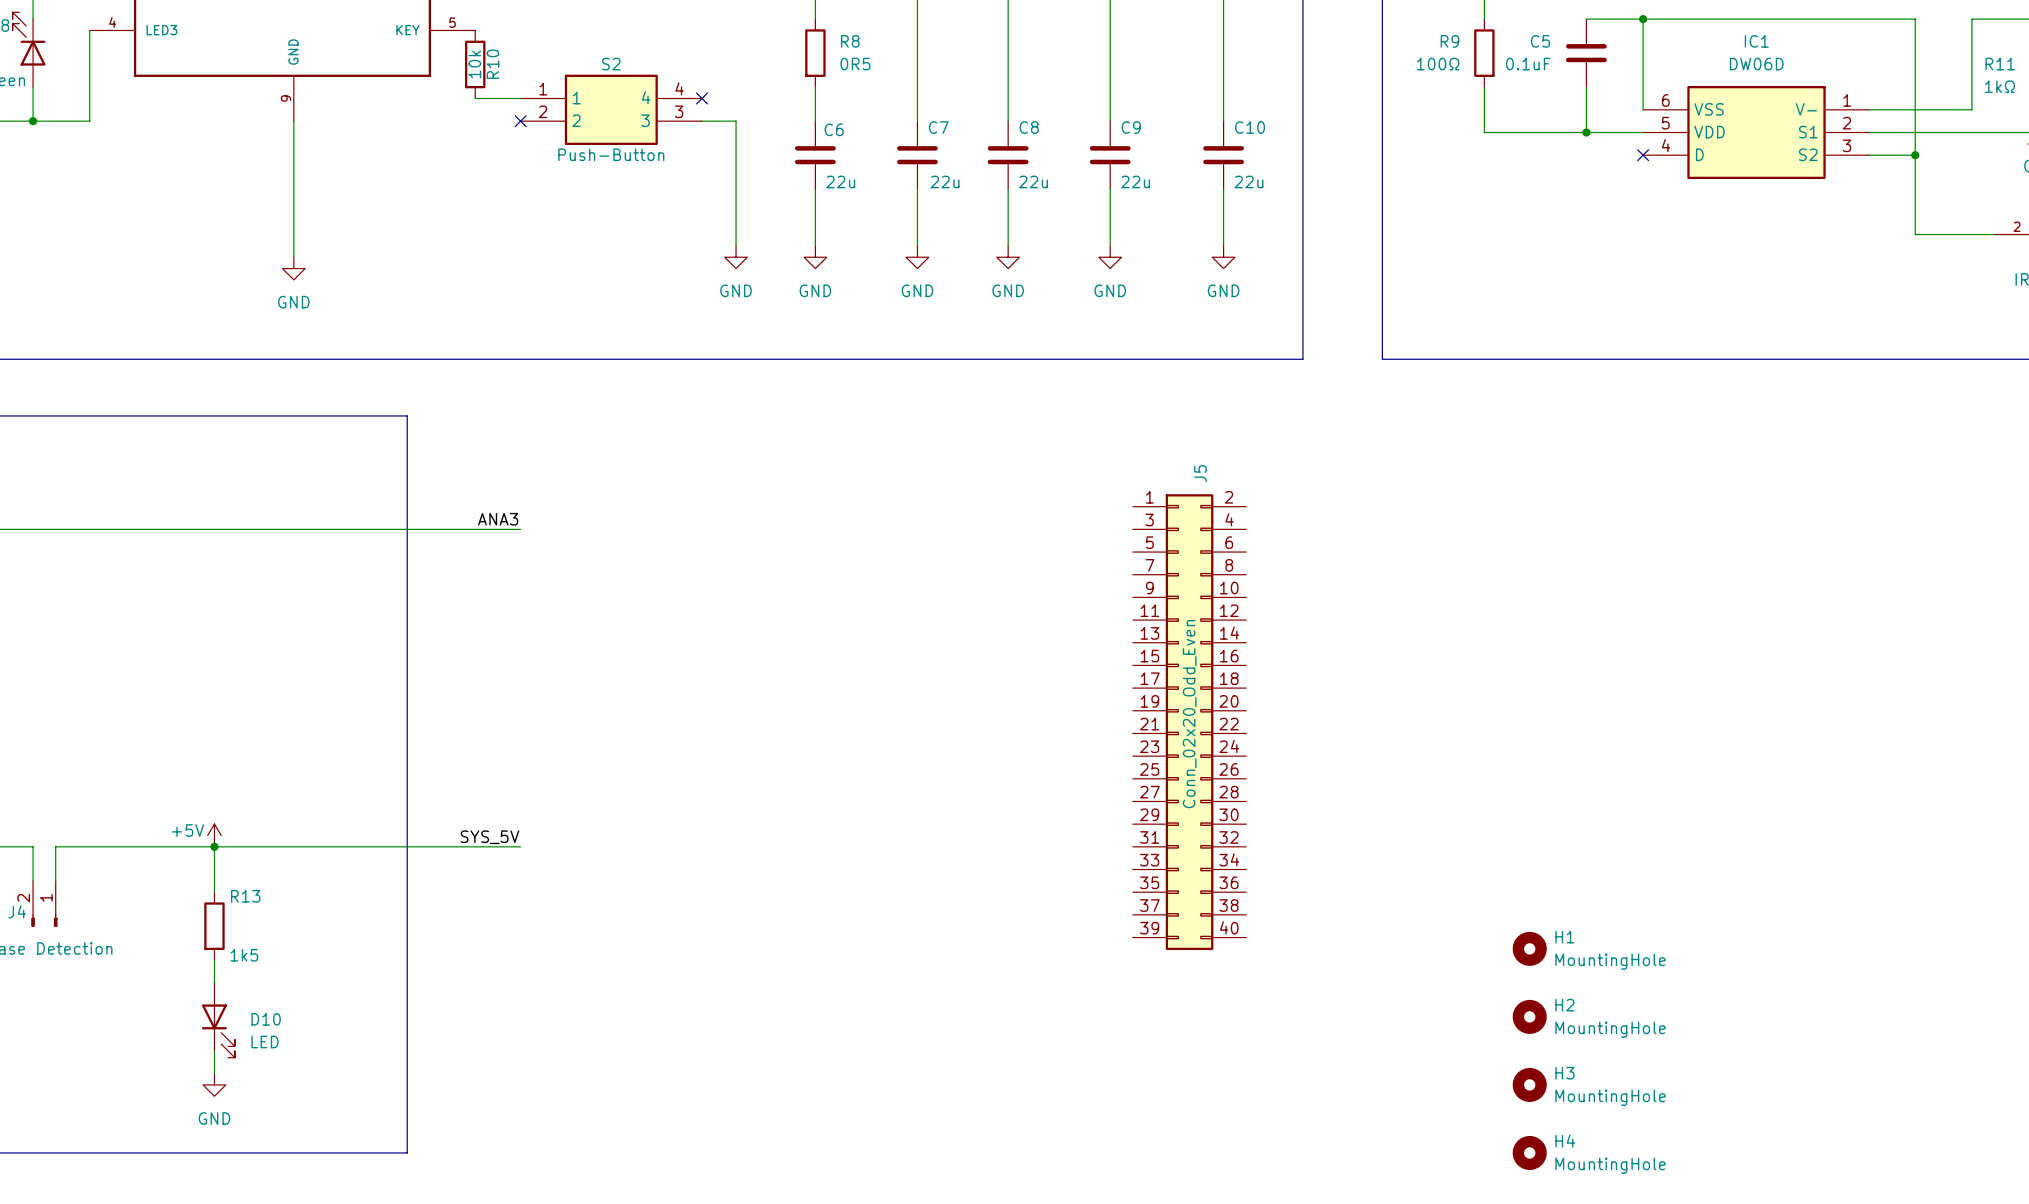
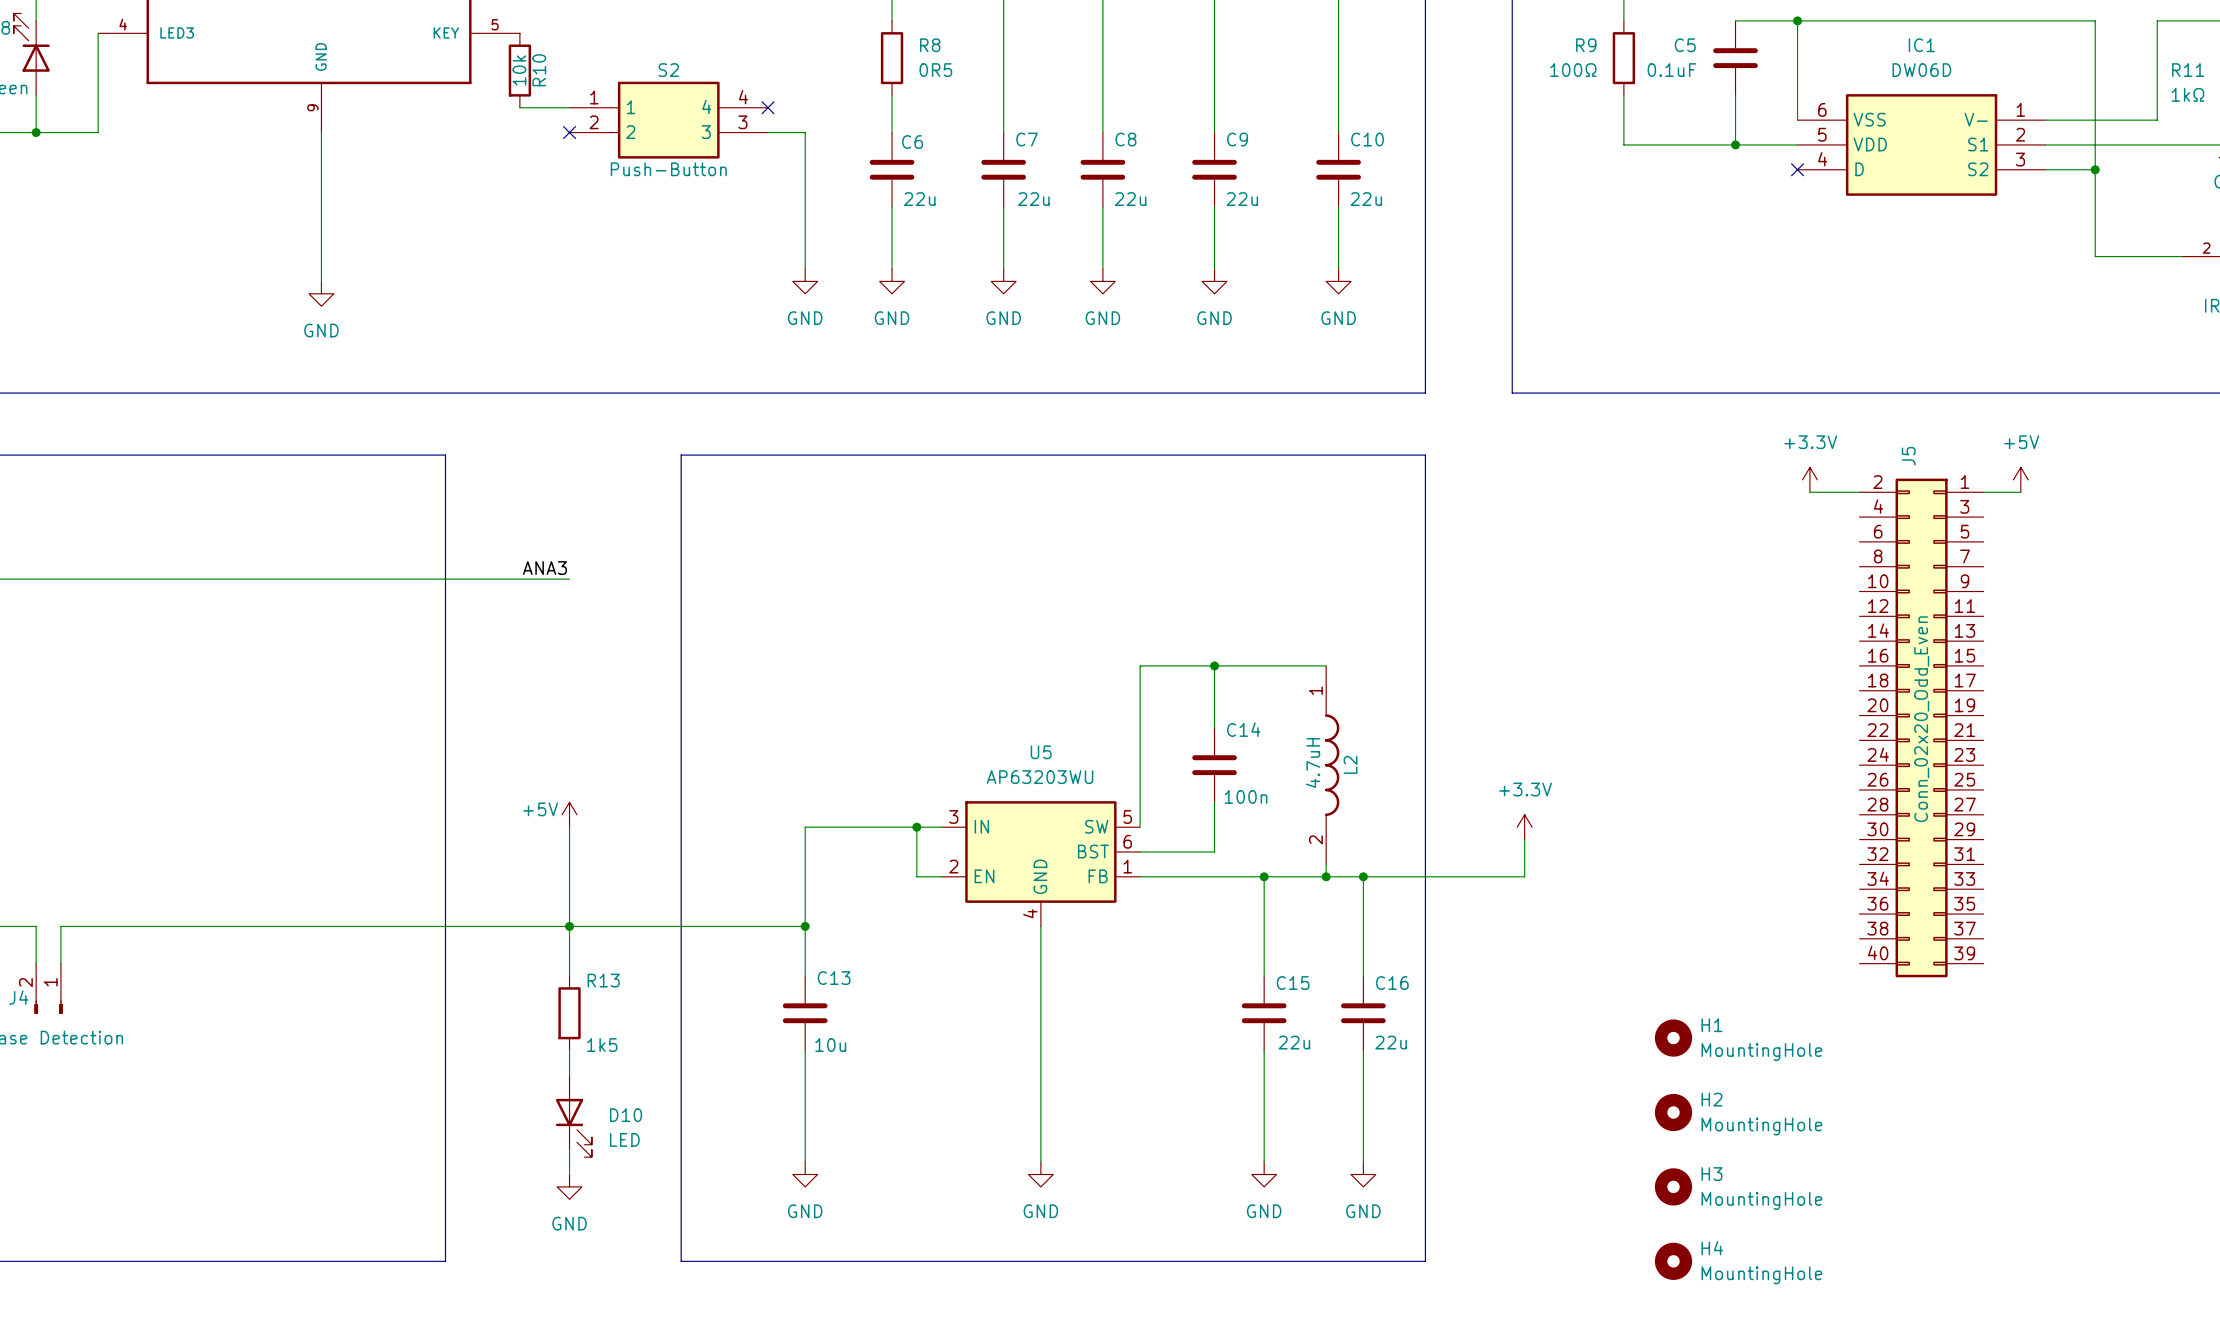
line: none -> (681, 455) (1425, 455) (1425, 1261) (681, 1261) (681, 455)
power symbol: none -> +3.3V (1809, 479)
power symbol: none -> +5V (2020, 479)
wire: none -> (1809, 492) (1859, 492)
wire: none -> (1983, 492) (2020, 492)
wire: none -> (1214, 665) (1214, 727)
junction: none -> (1214, 665)
wire: none -> (1326, 665) (1140, 665) (1140, 827)
C14: none -> 100n (1214, 765)
L2: none -> 4.7uH (1332, 765)
J5 flip: as is (1189, 722) -> left-right (1921, 727)
J5 position: (1189, 722) -> (1921, 727)
wire: none -> (1214, 802) (1214, 852) (1140, 852)
power symbol: none -> +5V (569, 814)
wire: none -> (569, 827) (569, 976)
wire: none -> (916, 827) (916, 876) (941, 876)
junction: none -> (916, 827)
wire: none -> (941, 827) (805, 827) (805, 976)
power symbol: none -> +3.3V (1524, 827)
wire: none -> (1524, 839) (1524, 876) (1140, 876)
U5: none -> AP63203WU (1040, 863)
wire: none -> (1264, 876) (1264, 976)
junction: none -> (1264, 876)
junction: none -> (1326, 876)
wire: none -> (1363, 876) (1363, 976)
junction: none -> (1363, 876)
power symbol: +5V (214, 835) -> none
label: SYS_5V (490, 837) -> none
wire: (214, 846) (214, 892) -> none
junction: (214, 846) -> none
wire: none -> (569, 926) (805, 926)
junction: none -> (569, 926)
junction: none -> (805, 926)
wire: none -> (1040, 926) (1040, 1162)
R13 position: (214, 926) -> (569, 1013)
C13: none -> 10u (805, 1013)
C15: none -> 22u (1264, 1013)
C16: none -> 22u (1363, 1013)
wire: (214, 960) (214, 982) -> none
wire: none -> (569, 1050) (569, 1075)
wire: none -> (805, 1050) (805, 1162)
wire: none -> (1264, 1050) (1264, 1162)
wire: none -> (1363, 1050) (1363, 1162)
D10 position: (218, 1020) -> (573, 1116)
wire: (214, 1050) (214, 1073) -> none
wire: none -> (569, 1149) (569, 1174)
power symbol: none -> GND (805, 1174)
power symbol: none -> GND (1040, 1174)
power symbol: none -> GND (1264, 1174)
power symbol: none -> GND (1363, 1174)
power symbol: GND (214, 1084) -> none
power symbol: none -> GND (569, 1186)

